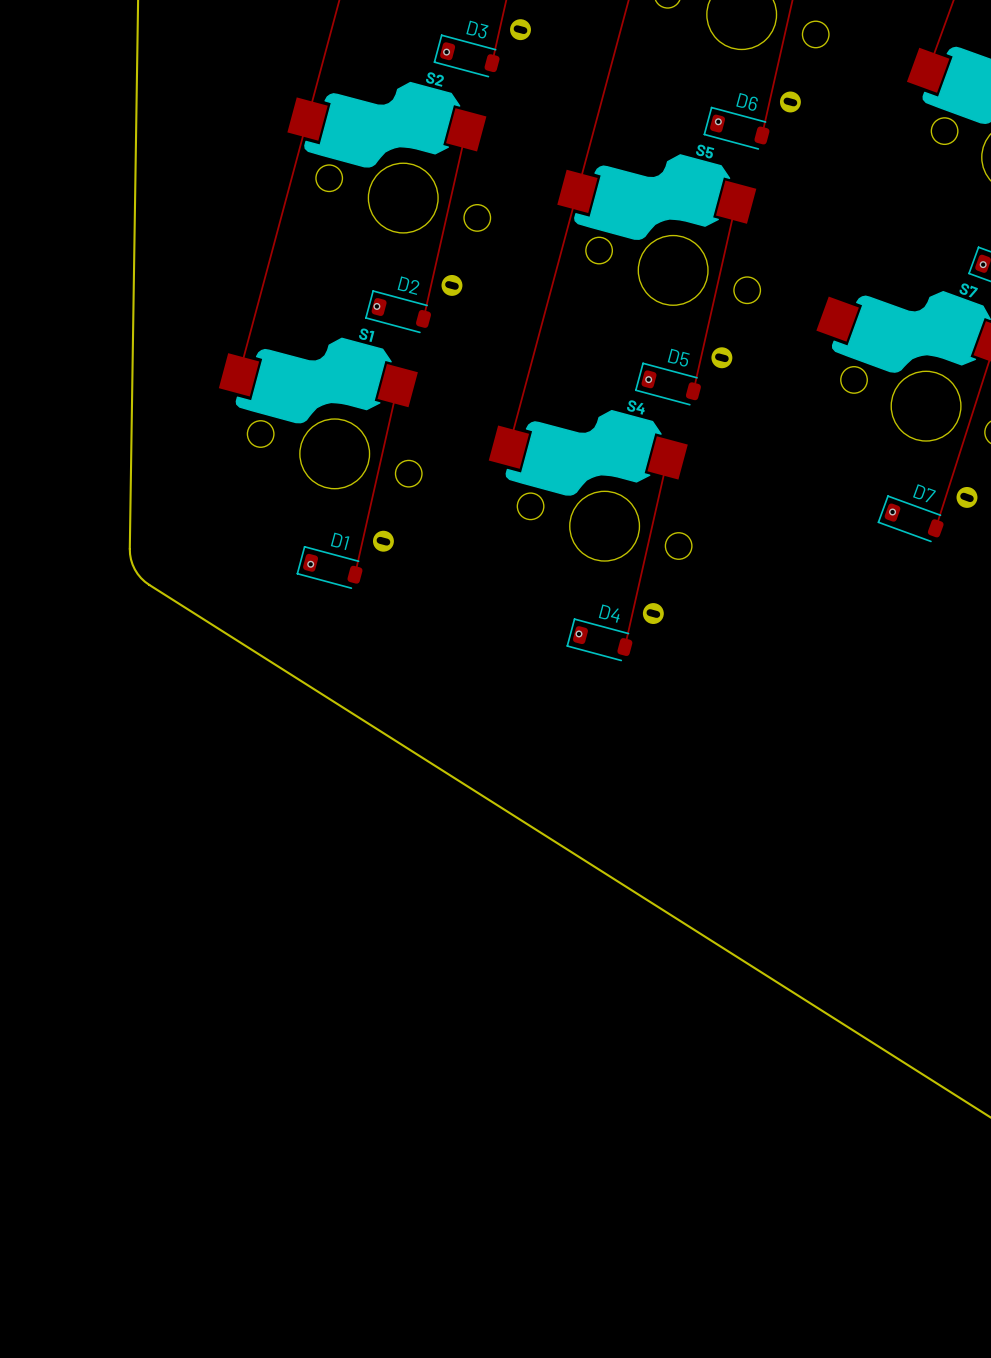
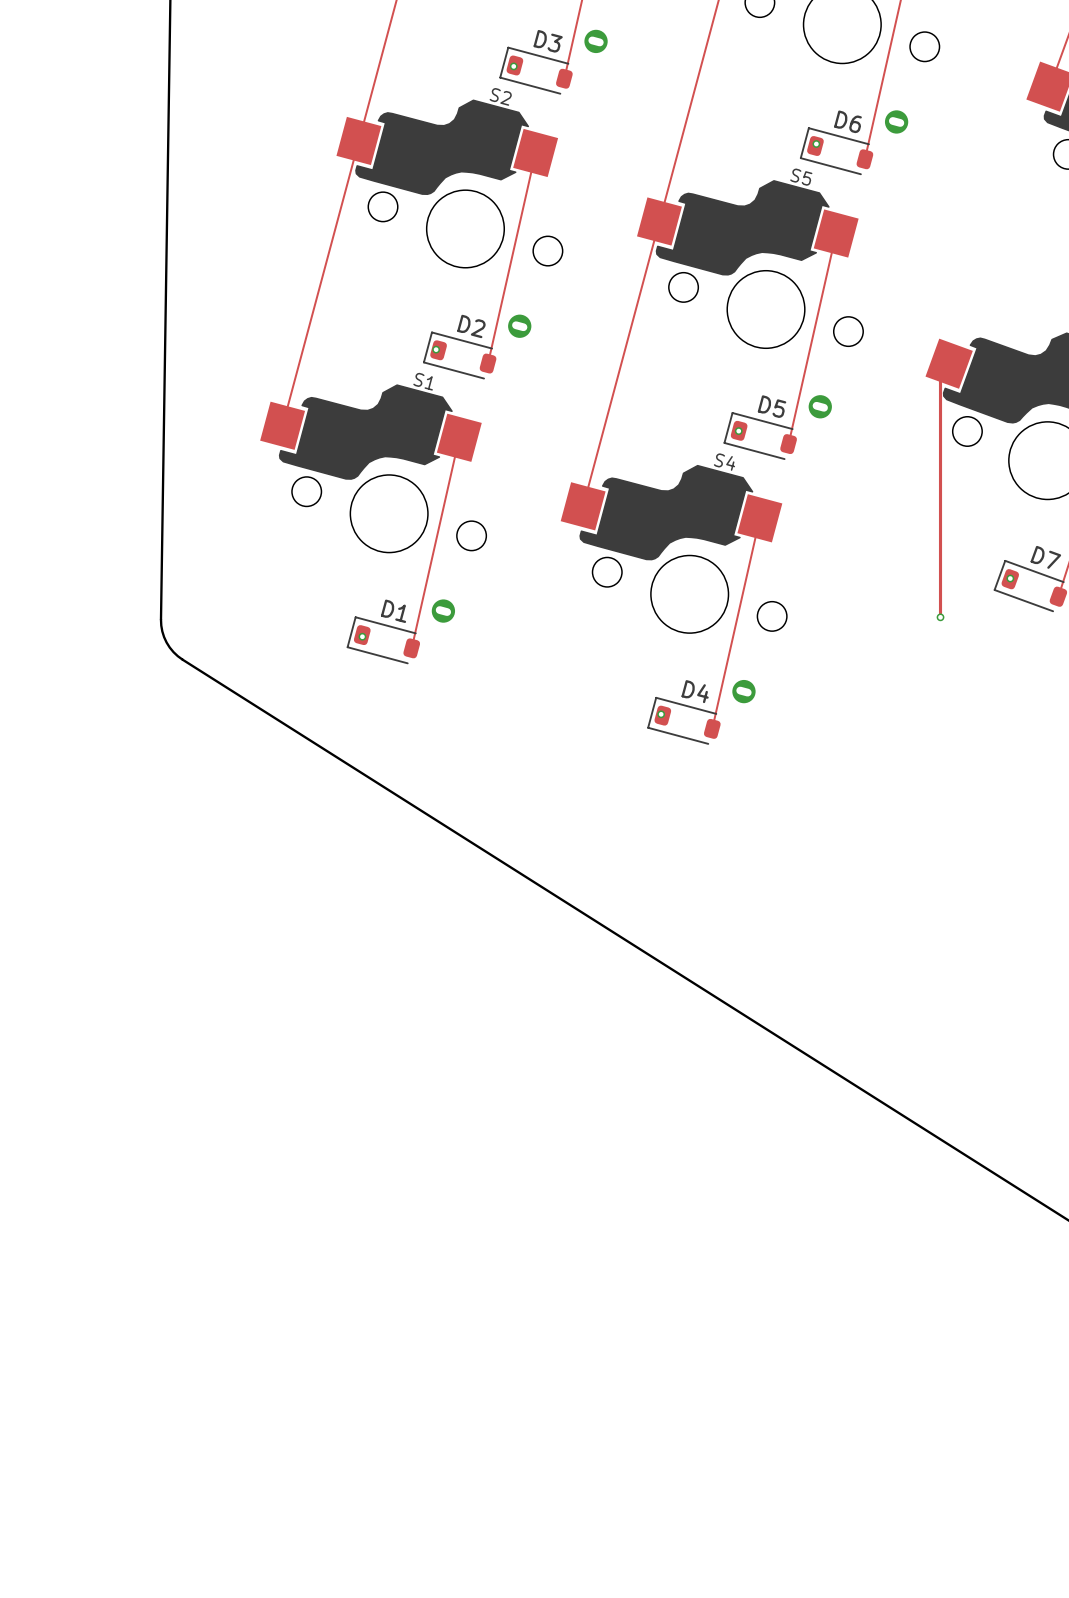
track: none -> (940, 372) (940, 617)
via: none -> (940, 617)

